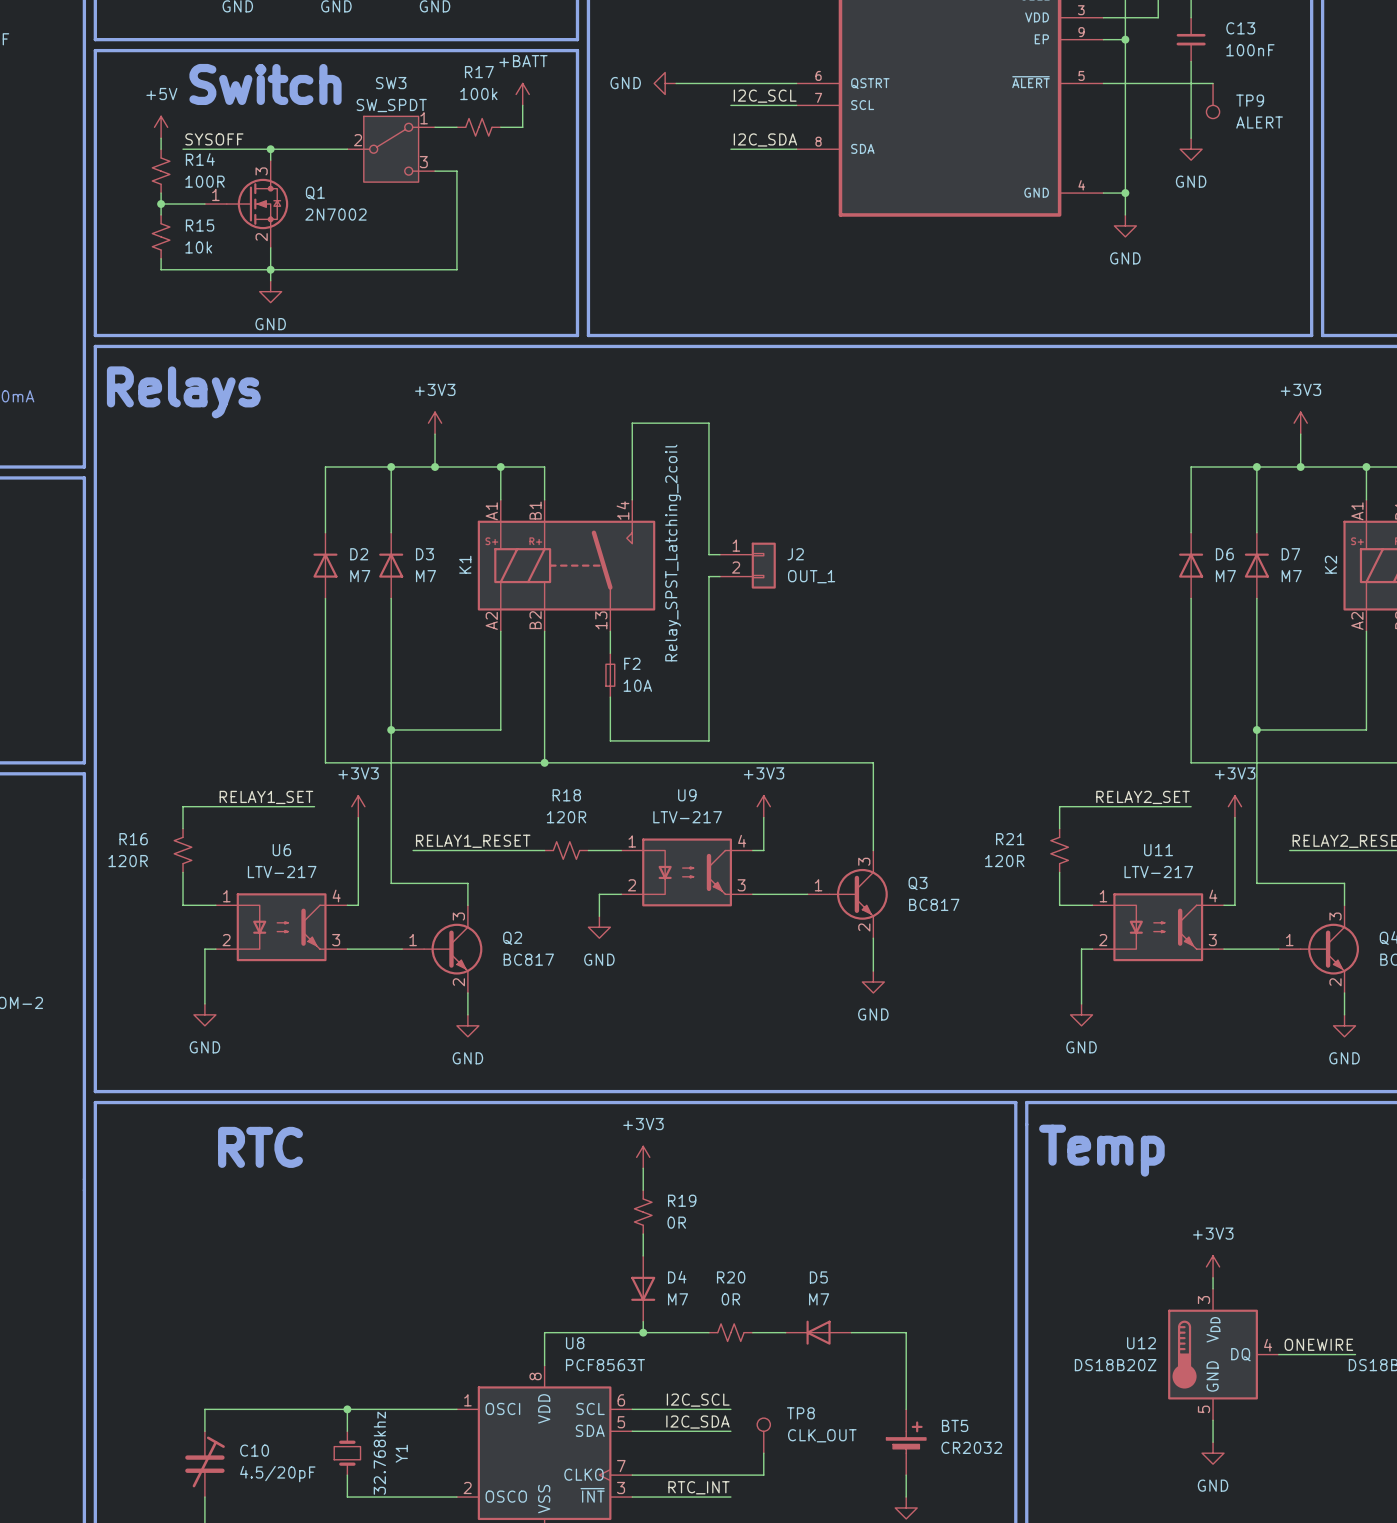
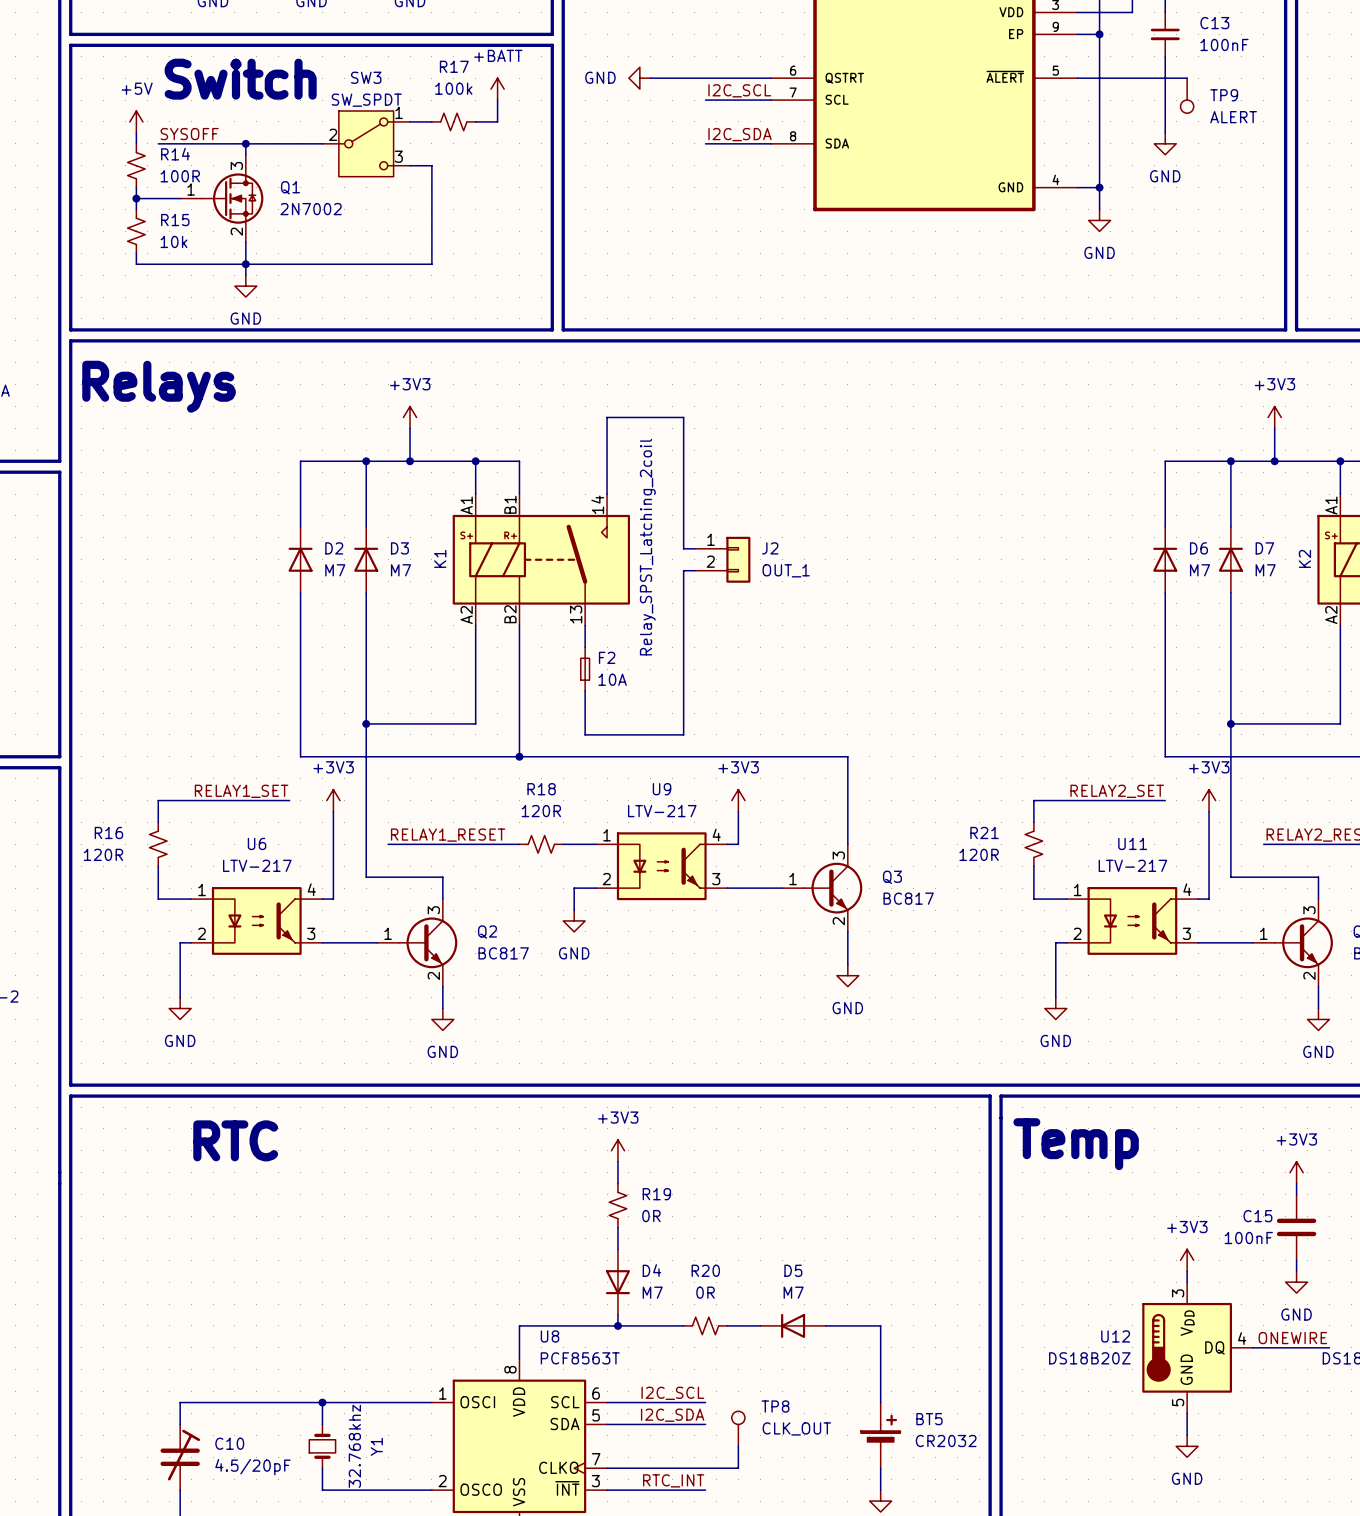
power symbol: none -> +3V3 (1296, 1172)
wire: none -> (1296, 1183) (1296, 1194)
C15: none -> 100nF (1296, 1227)
wire: none -> (1296, 1260) (1296, 1271)
power symbol: none -> GND (1296, 1282)

